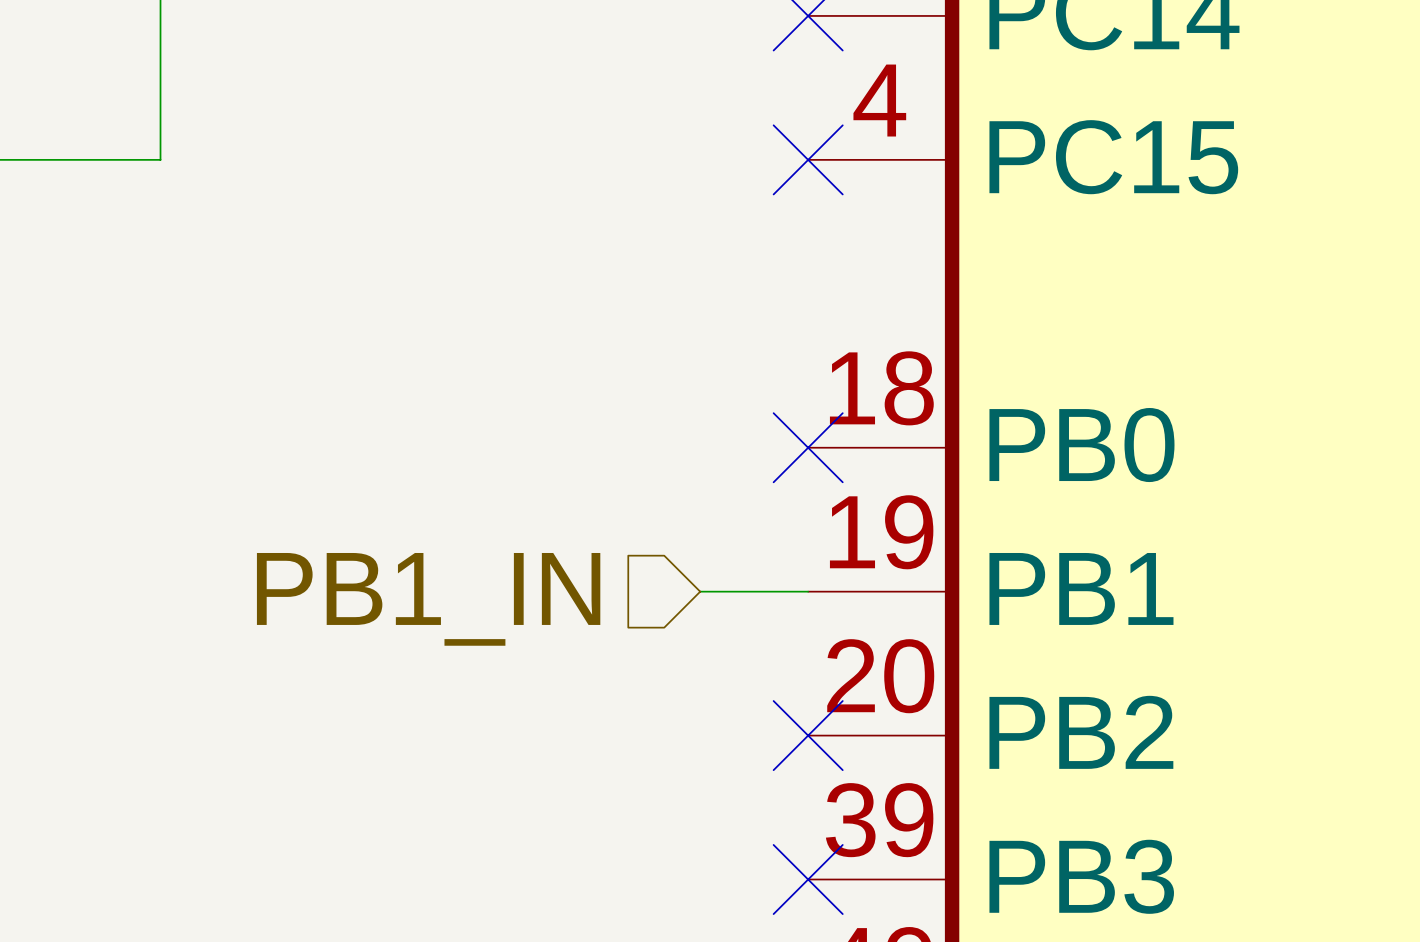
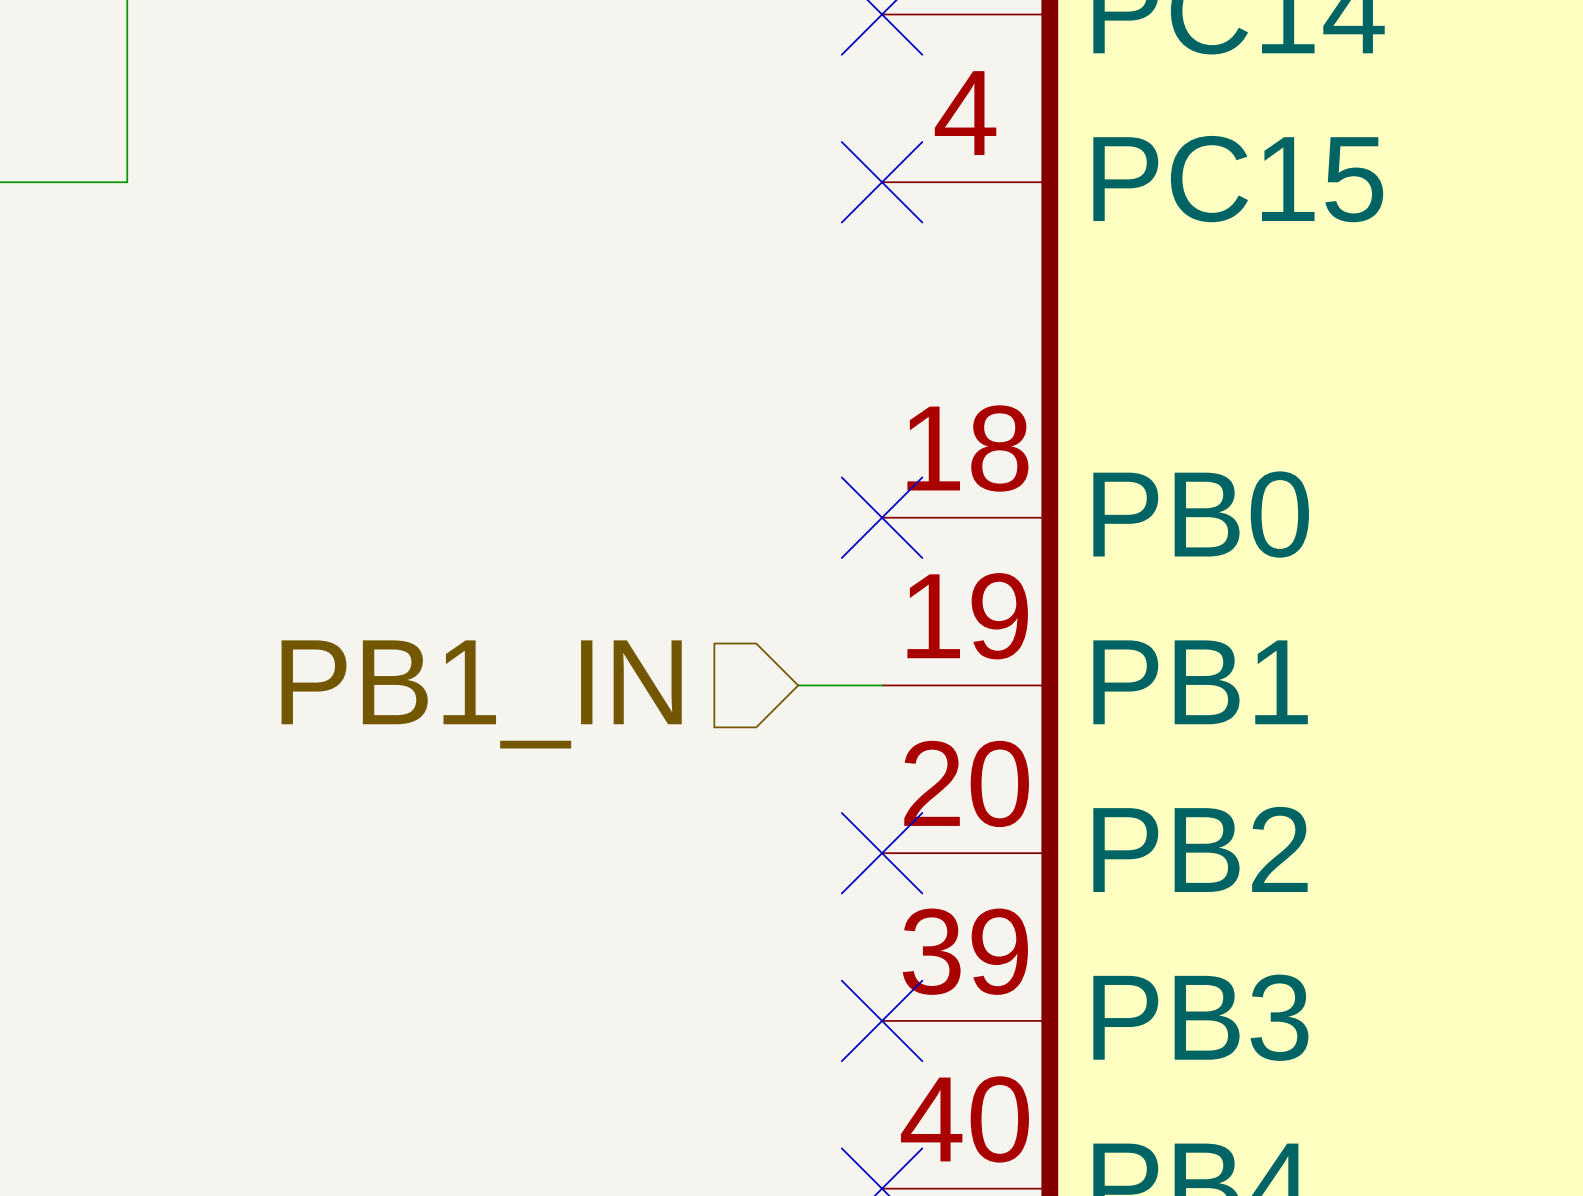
wire: (700, 591) (736, 591) -> none
hierarchical label position: PB1_IN (428, 599) -> PB1_IN (481, 694)

